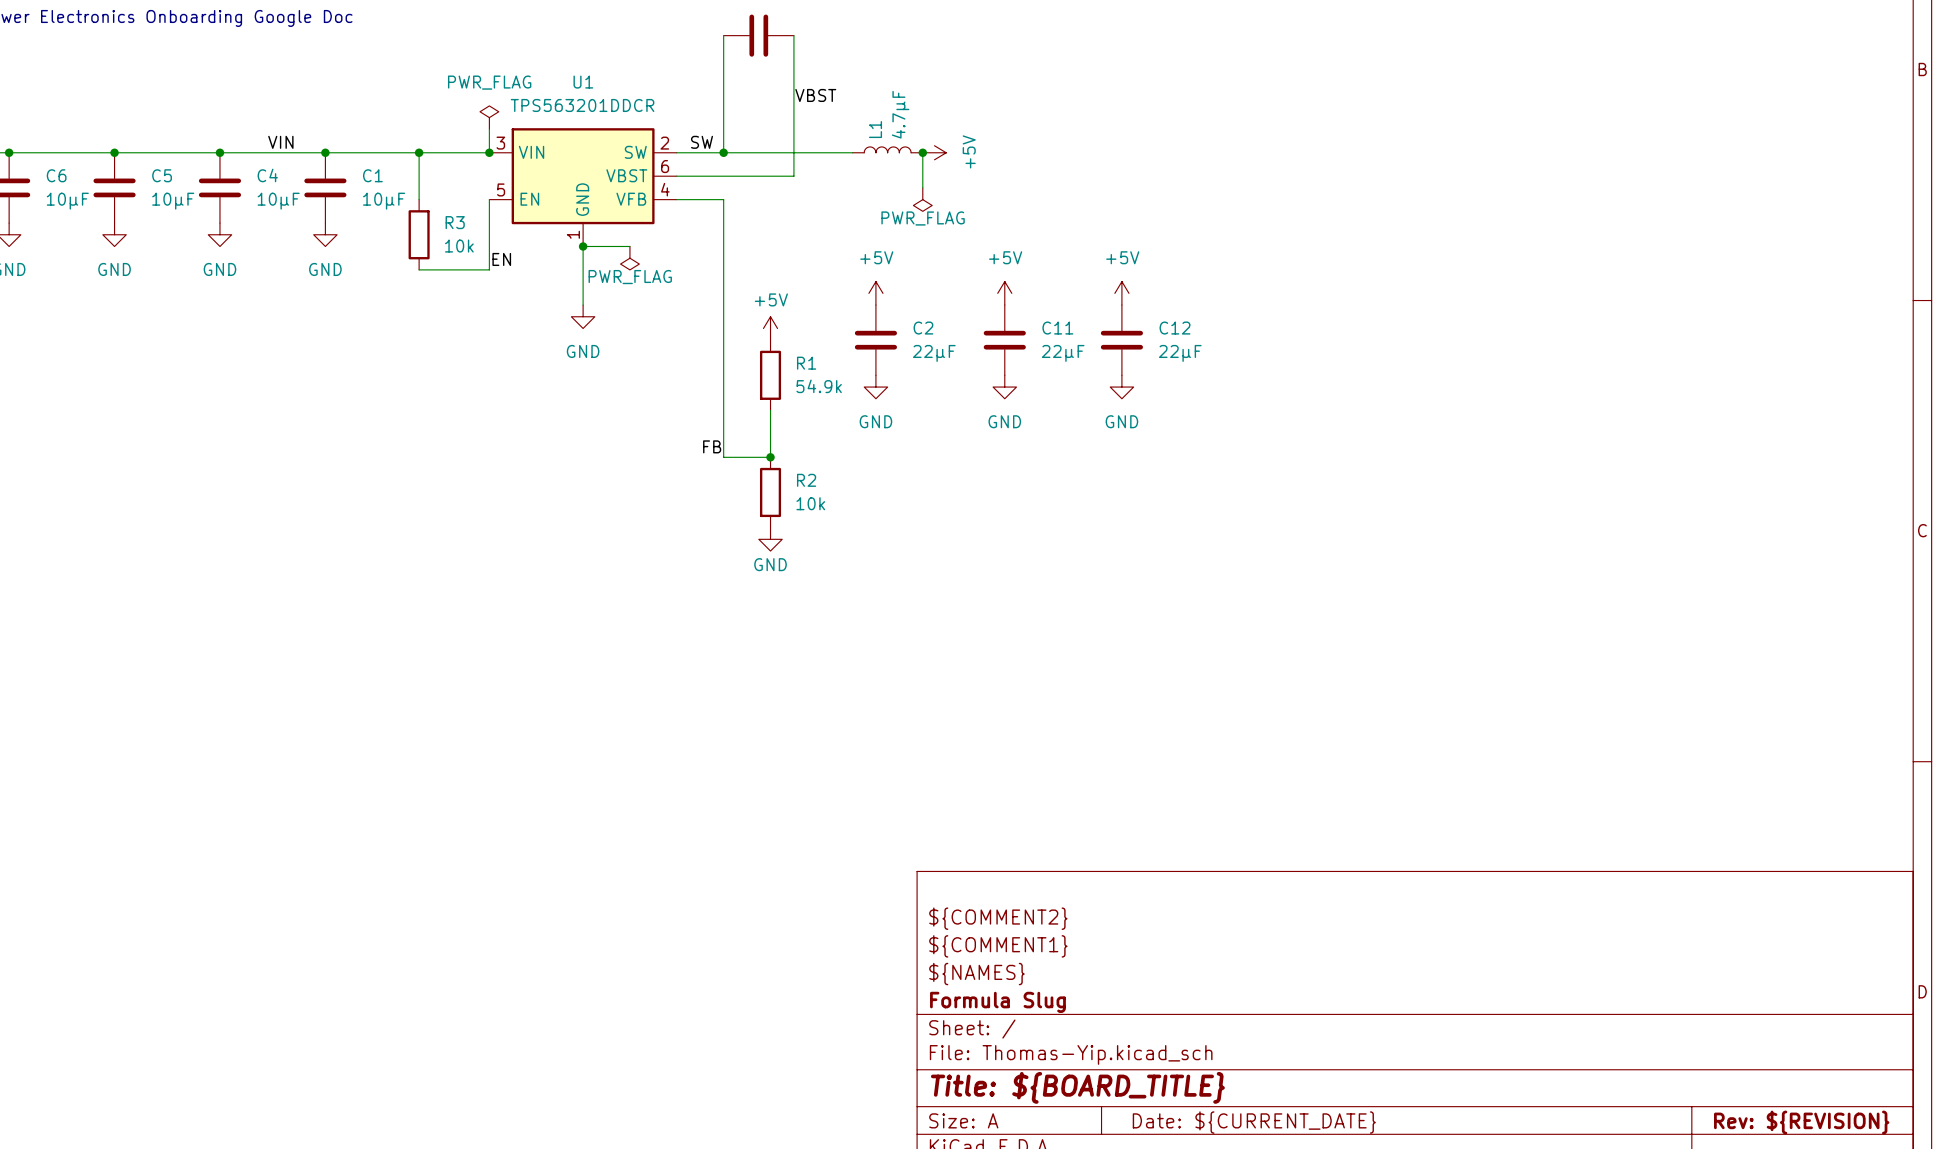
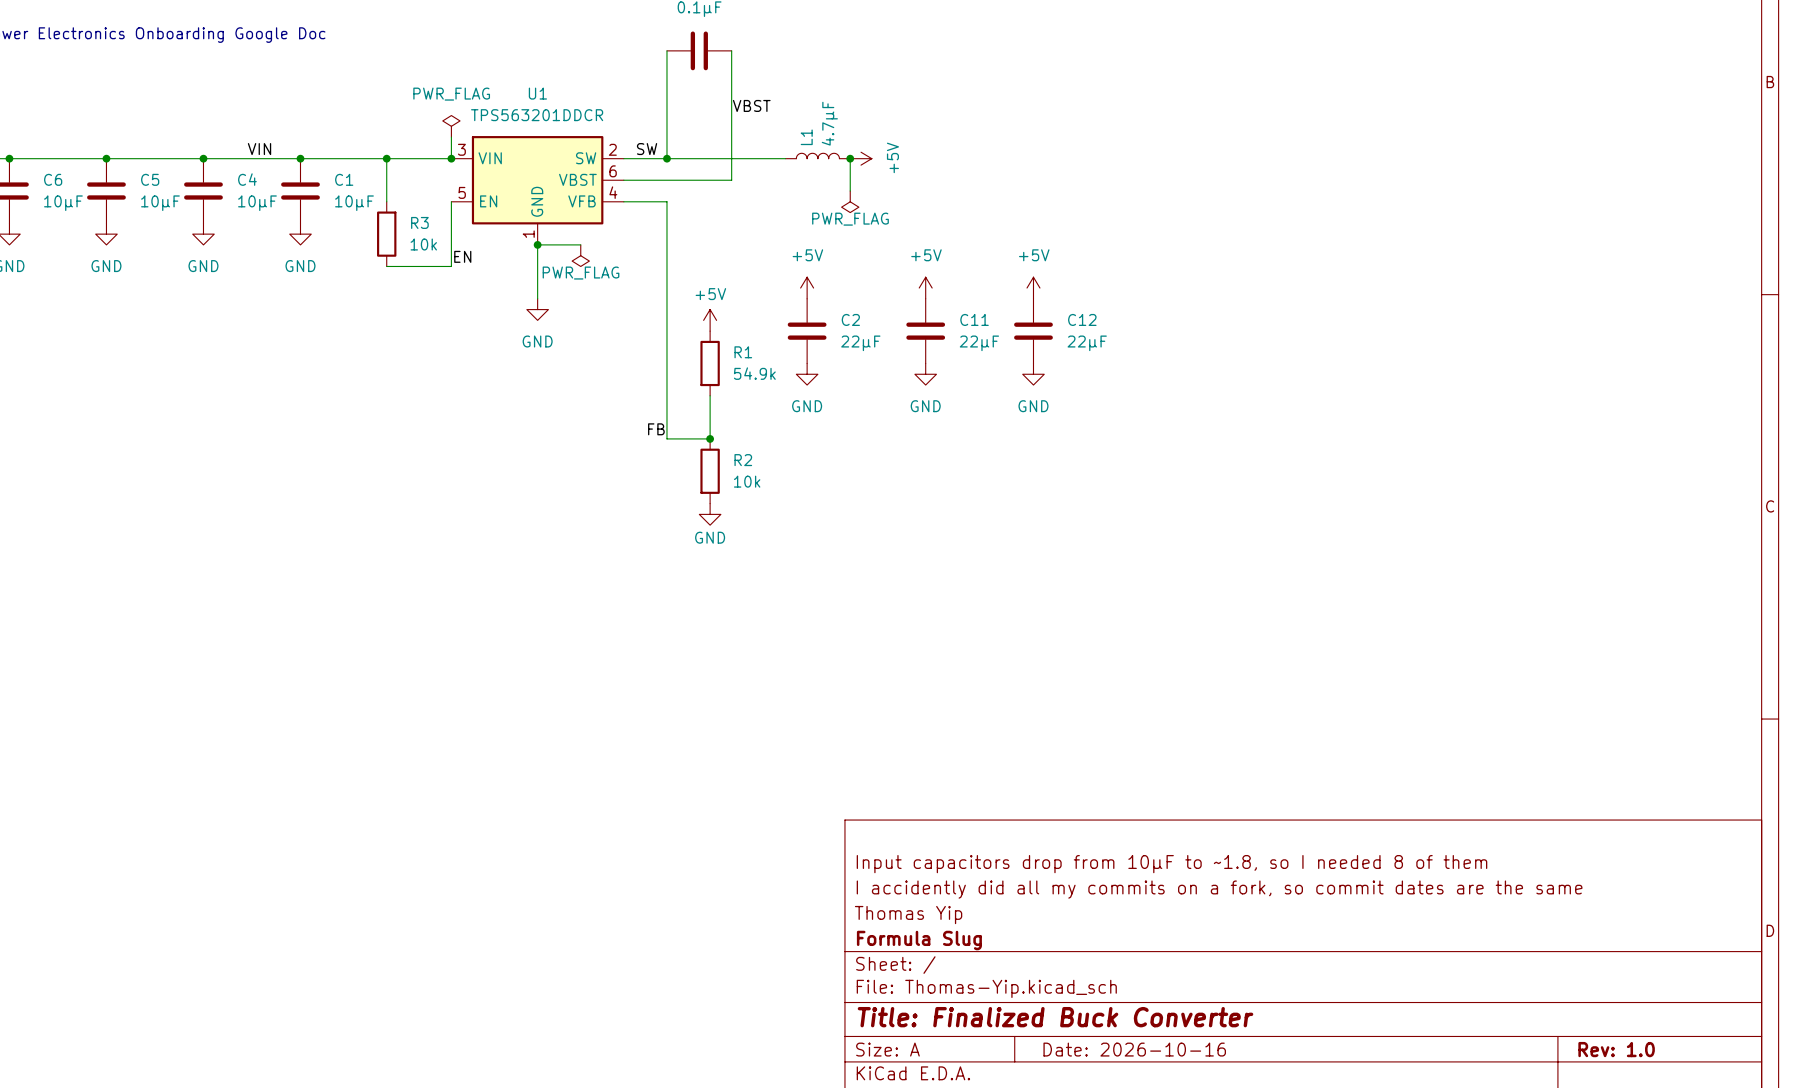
title block: ${COMMENT2} (998, 918) -> Input capacitors drop from 10µF to ~1.8, so I needed 8 of them (1171, 864)
title block: ${COMMENT1} (998, 946) -> I accidently did all my commits on a fork, so commit dates are the same (1219, 889)
title block: ${NAMES} (976, 974) -> Thomas Yip (908, 915)
title block: Title: ${BOARD_TITLE} (1077, 1087) -> Title: Finalized Buck Converter (1055, 1017)
title block: Date: ${CURRENT_DATE} (1254, 1122) -> Date: 2026-10-16 (1134, 1049)
title block: Rev: ${REVISION} (1801, 1122) -> Rev: 1.0 (1616, 1049)

